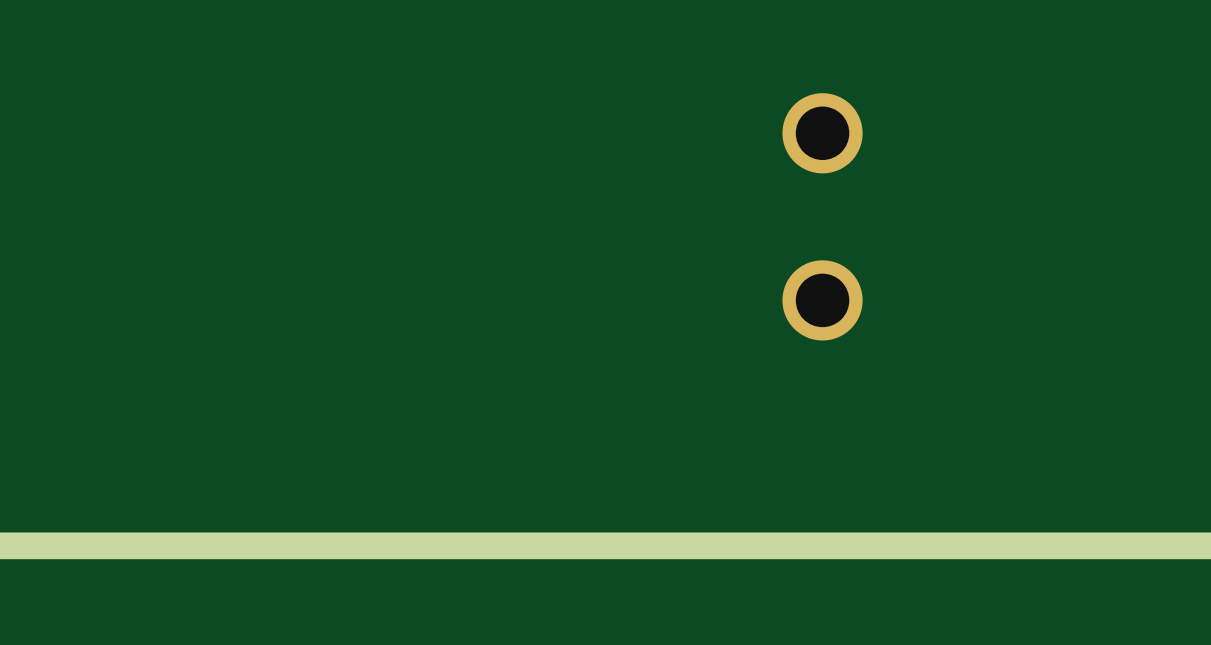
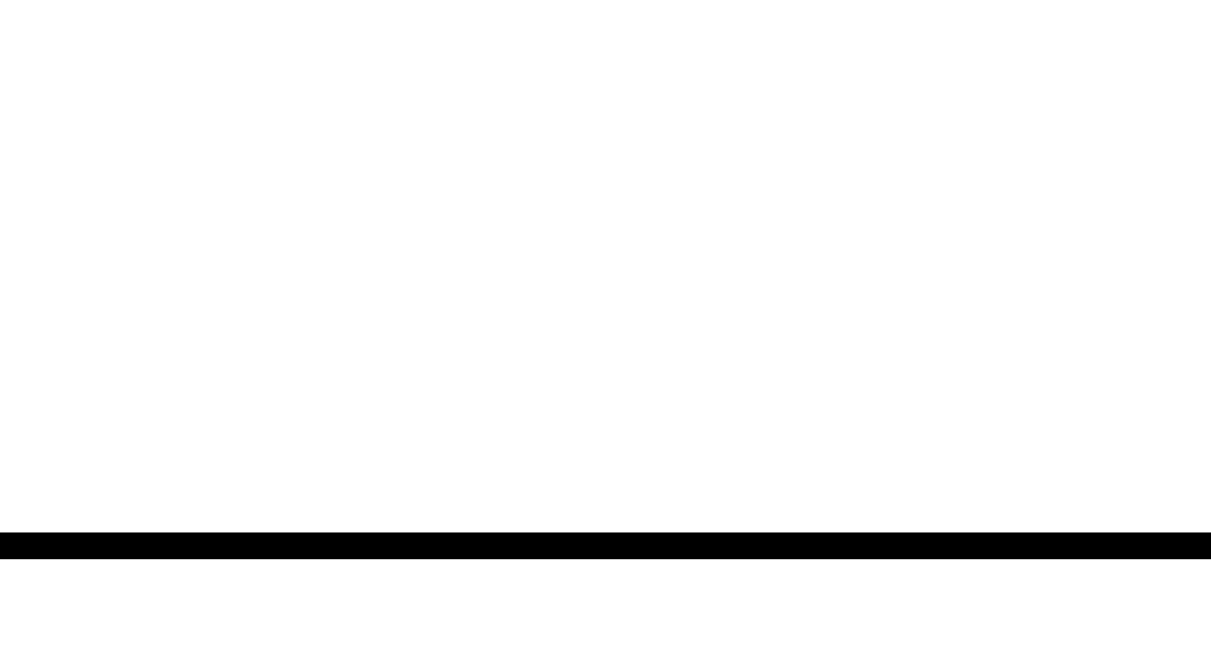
part: (822, 216) -> none

